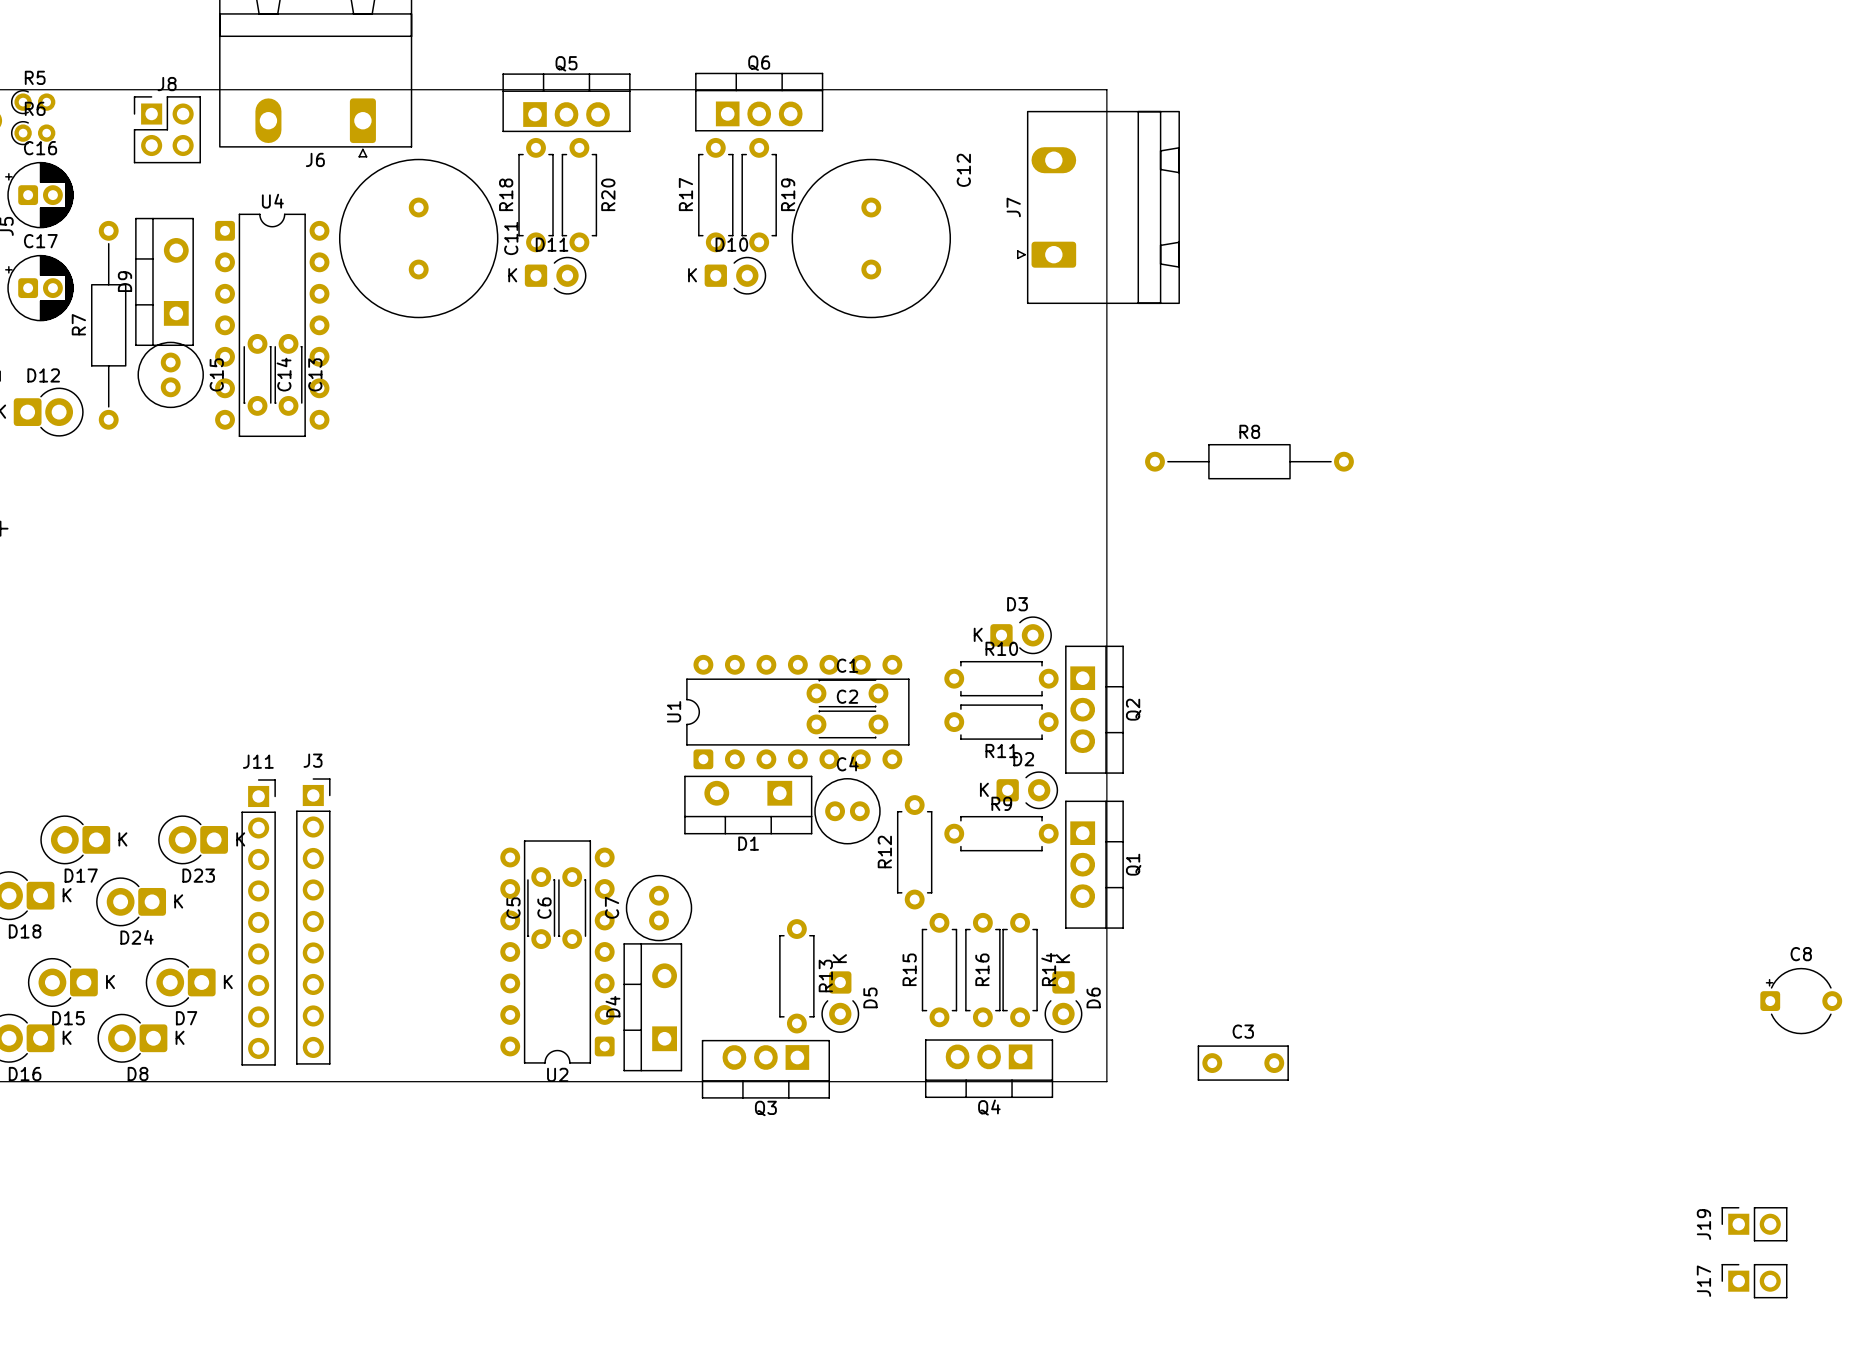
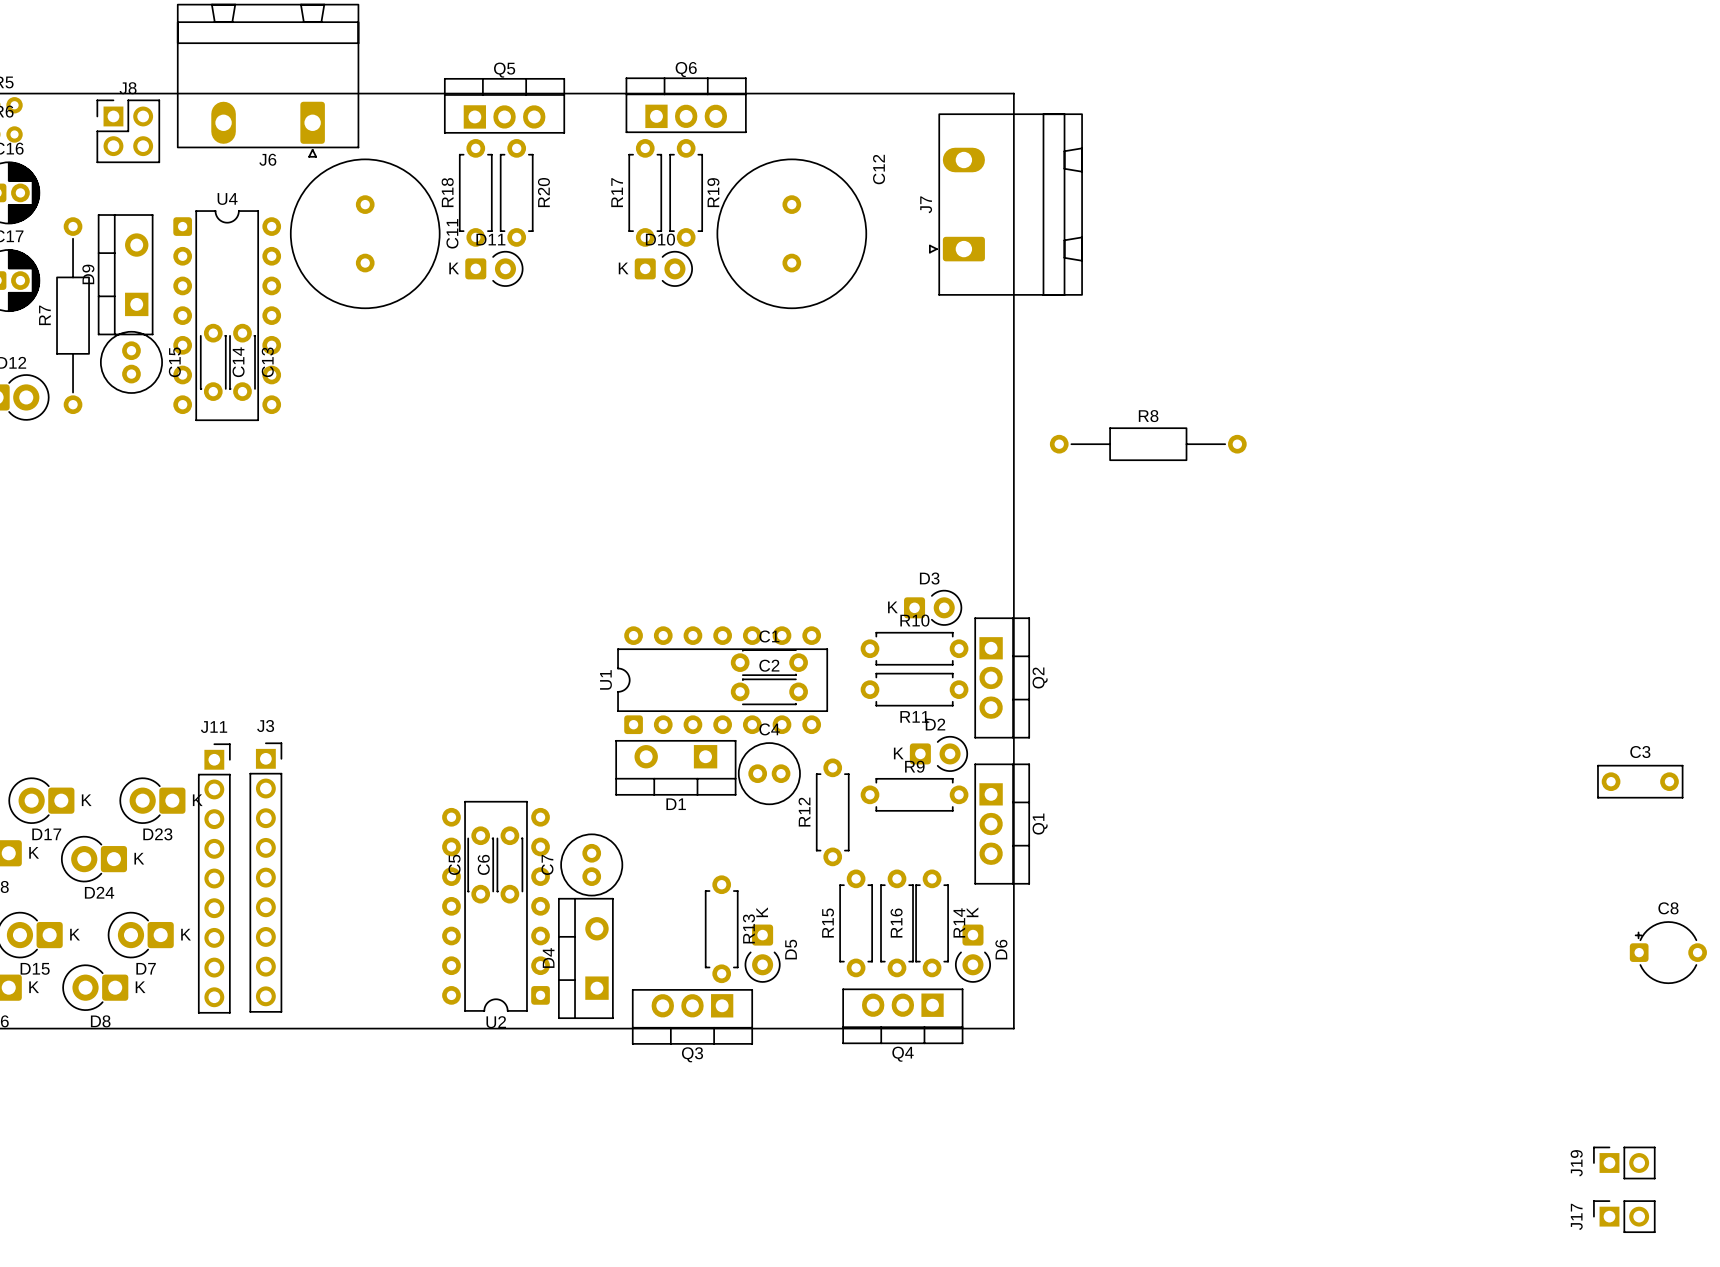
C3 position: (1243, 1063) -> (1640, 781)

